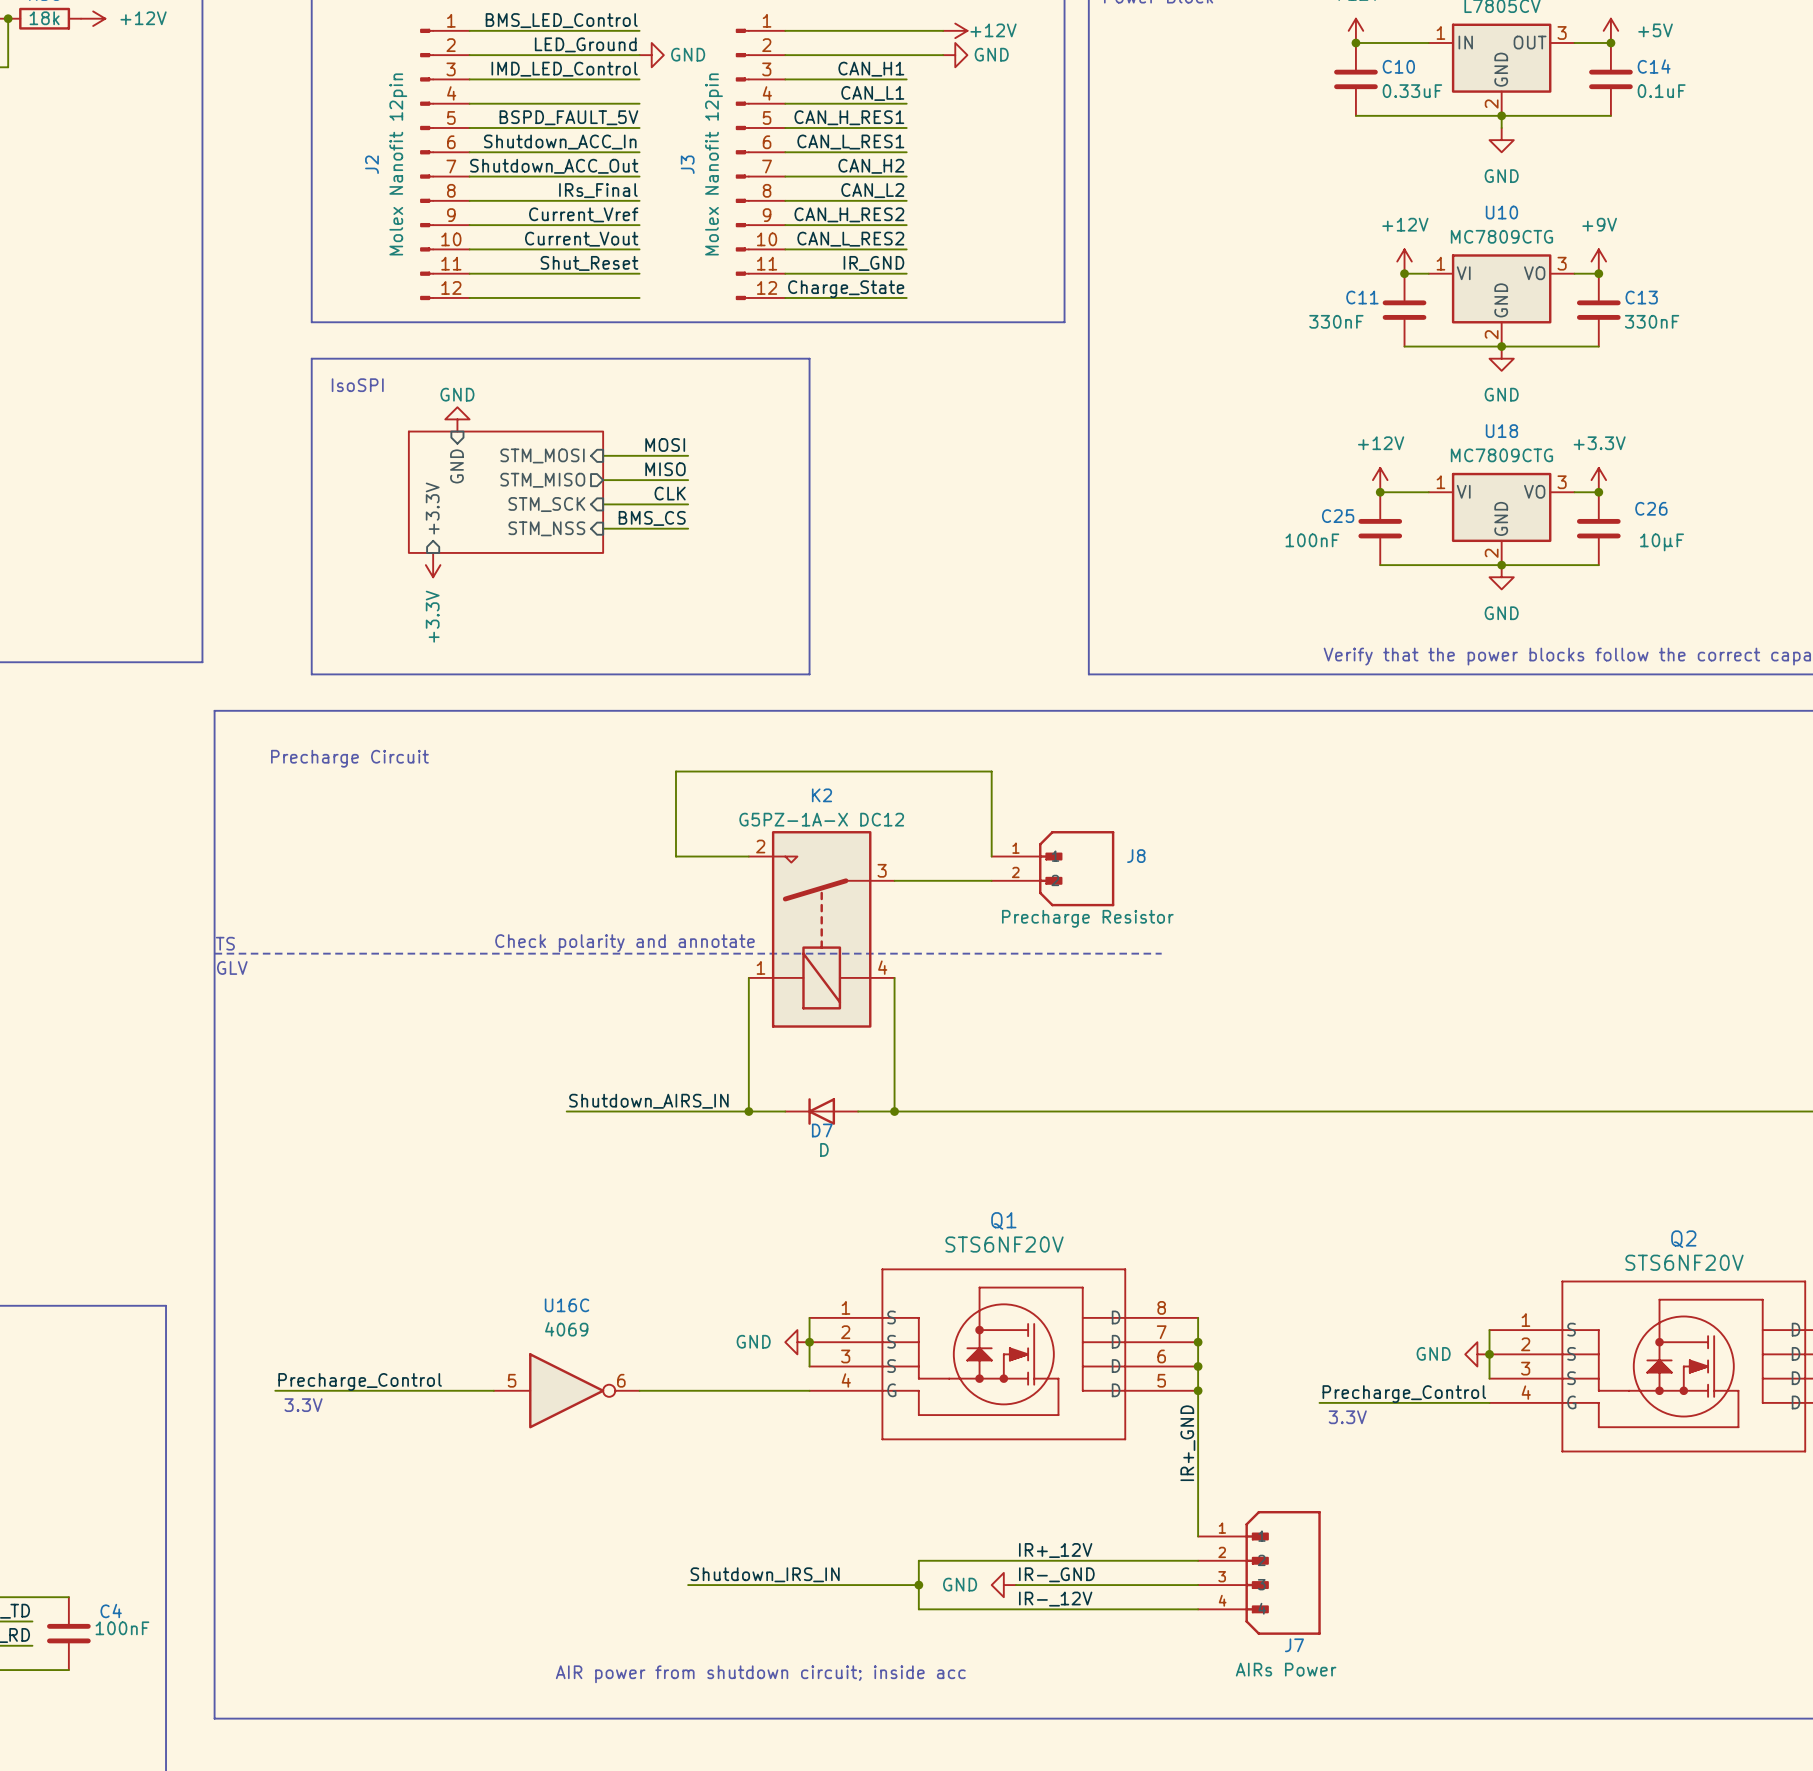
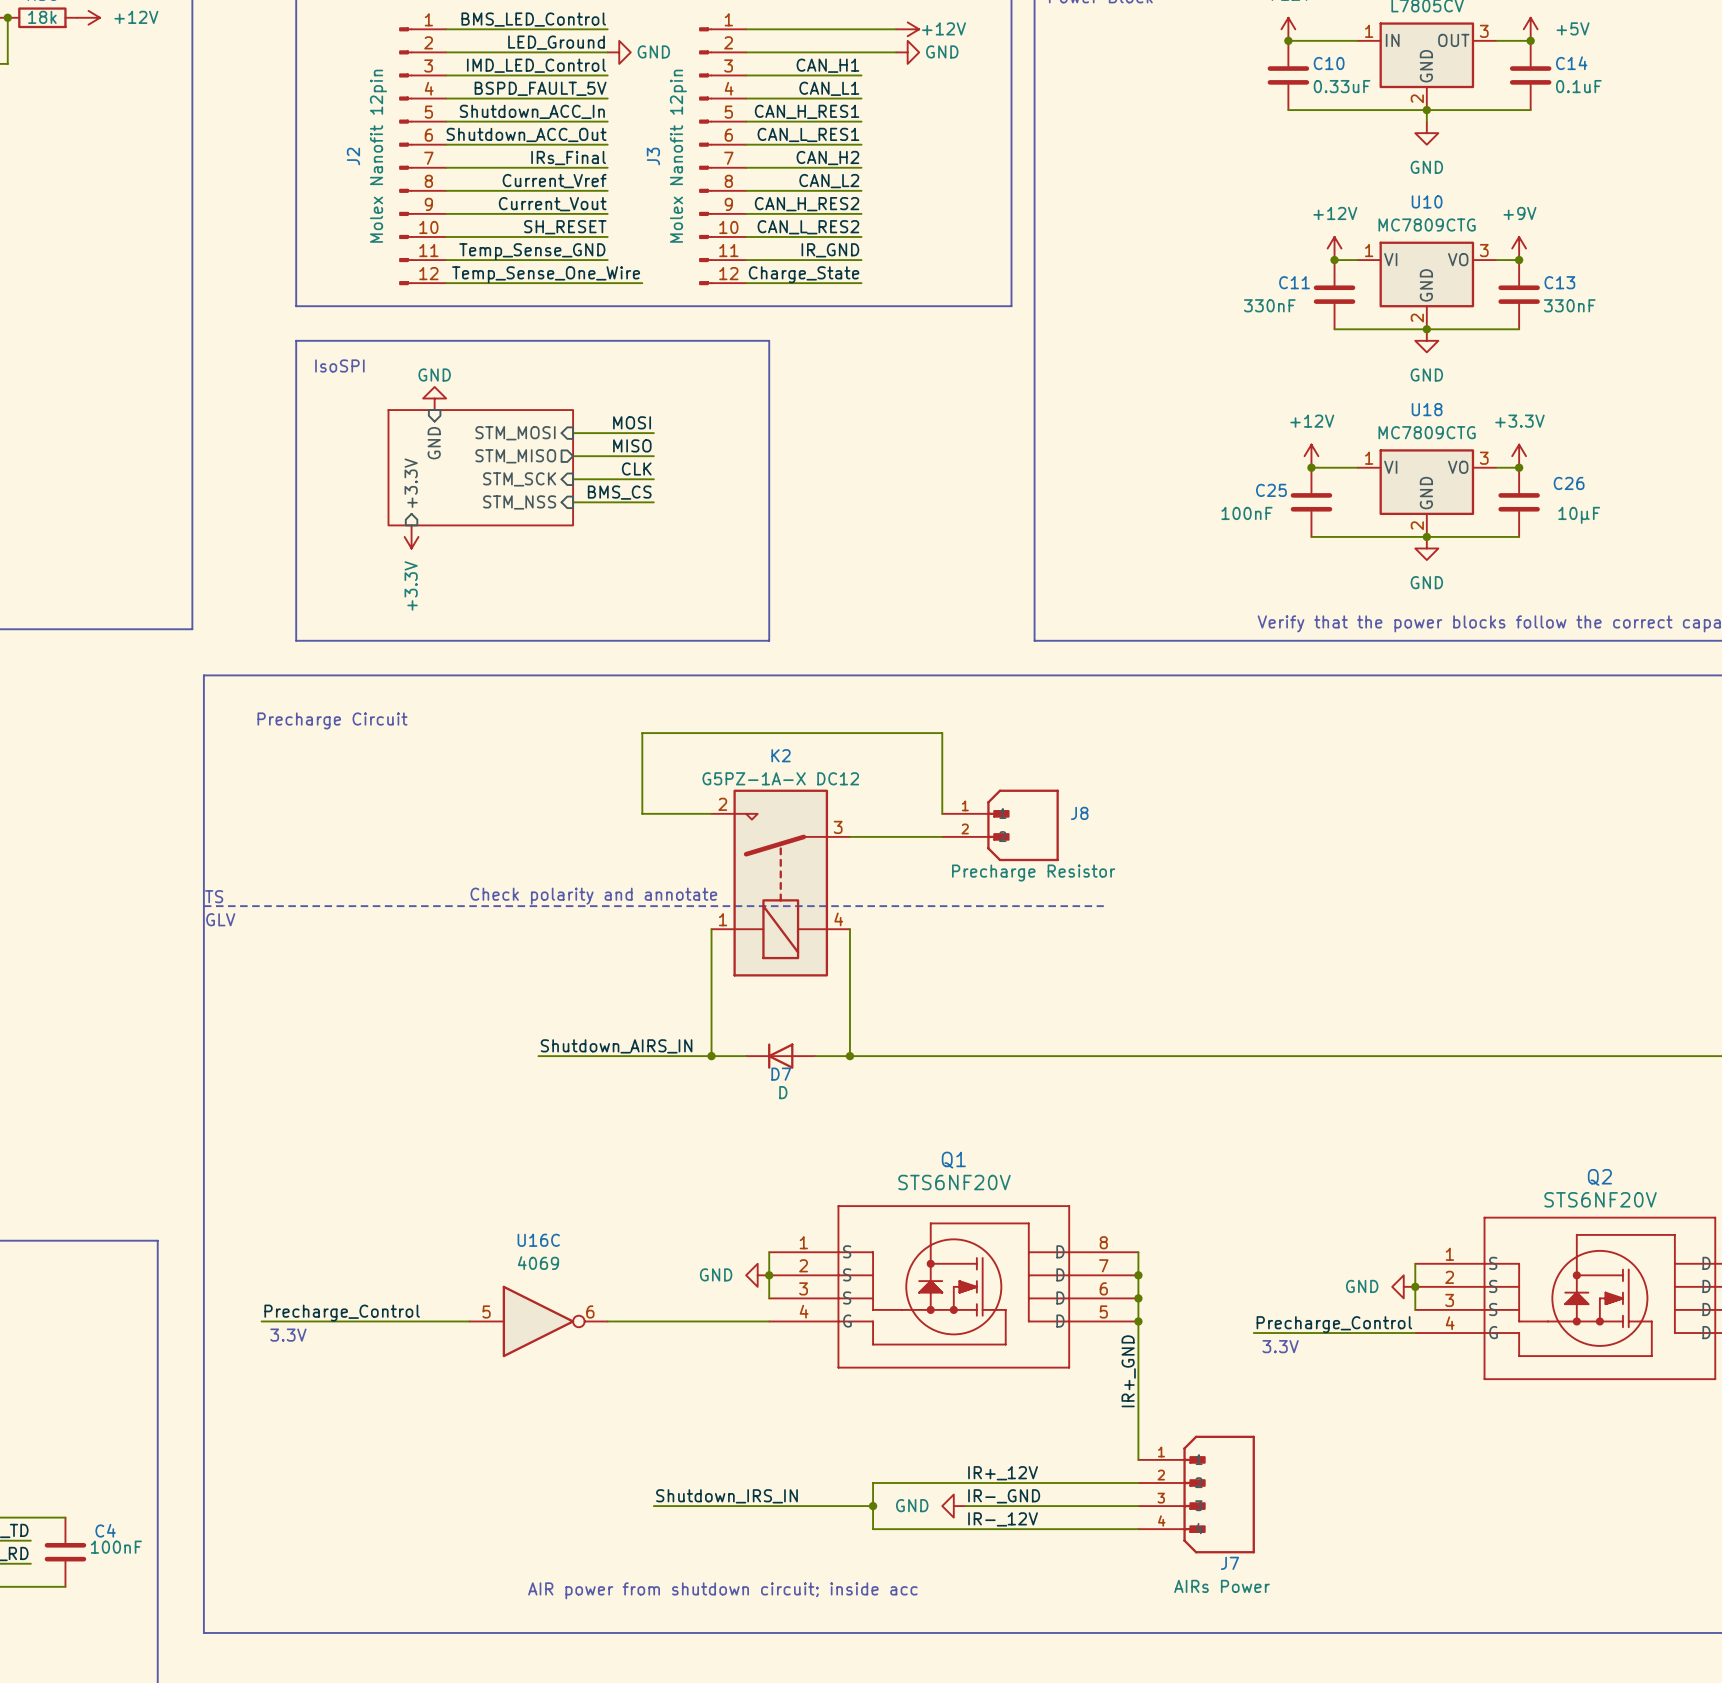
label: none -> BSPD_FAULT_5V (540, 88)
label: BSPD_FAULT_5V (568, 117) -> Shutdown_ACC_In (532, 111)
label: Shutdown_ACC_In (560, 142) -> Shutdown_ACC_Out (526, 134)
label: Shutdown_ACC_Out (554, 166) -> IRs_Final (568, 158)
label: IRs_Final (598, 190) -> Current_Vref (554, 181)
label: Current_Vref (583, 214) -> Current_Vout (552, 204)
label: Current_Vout (581, 239) -> SH_RESET (565, 227)
label: Shut_Reset (589, 263) -> Temp_Sense_GND (532, 251)
label: none -> Temp_Sense_One_Wire (546, 274)
wire: none -> (607, 283) (642, 283)

